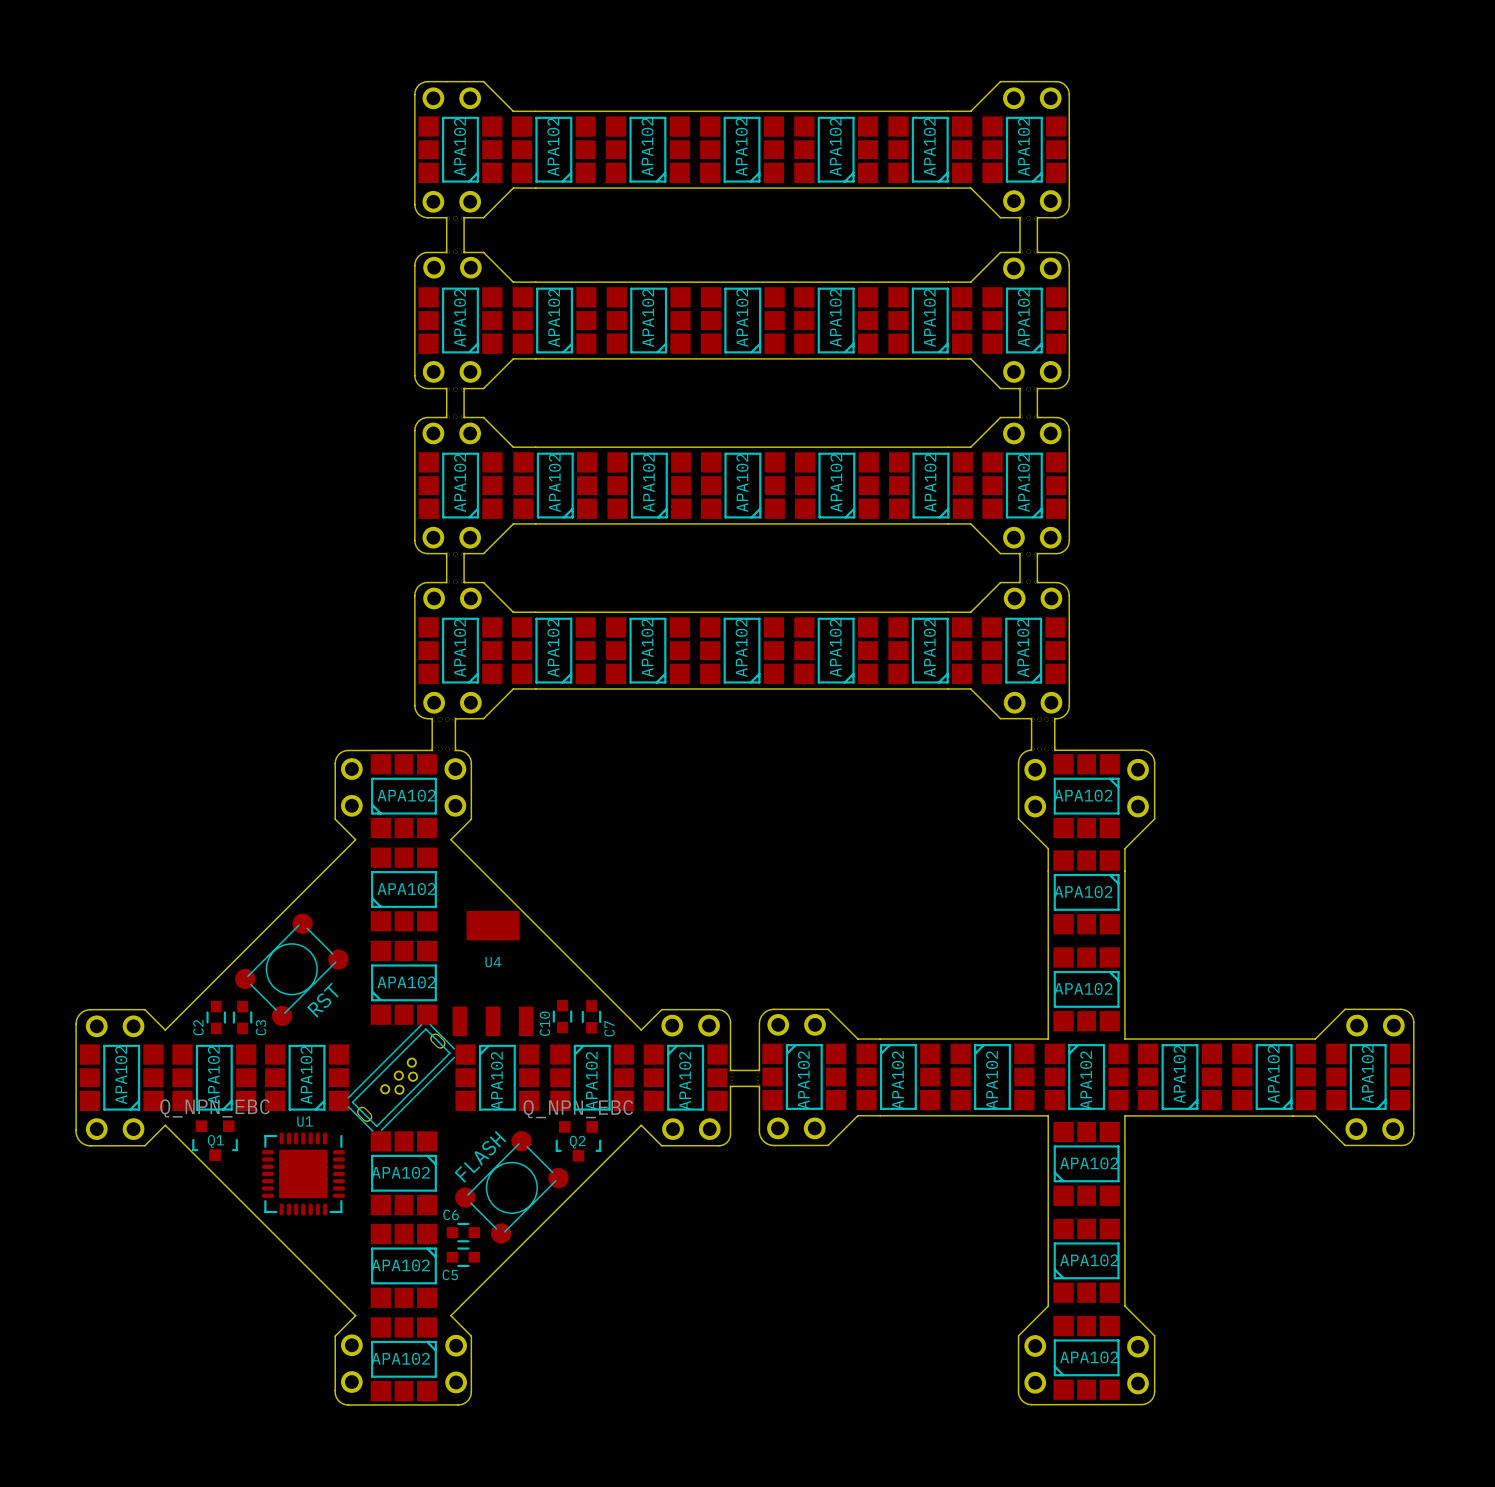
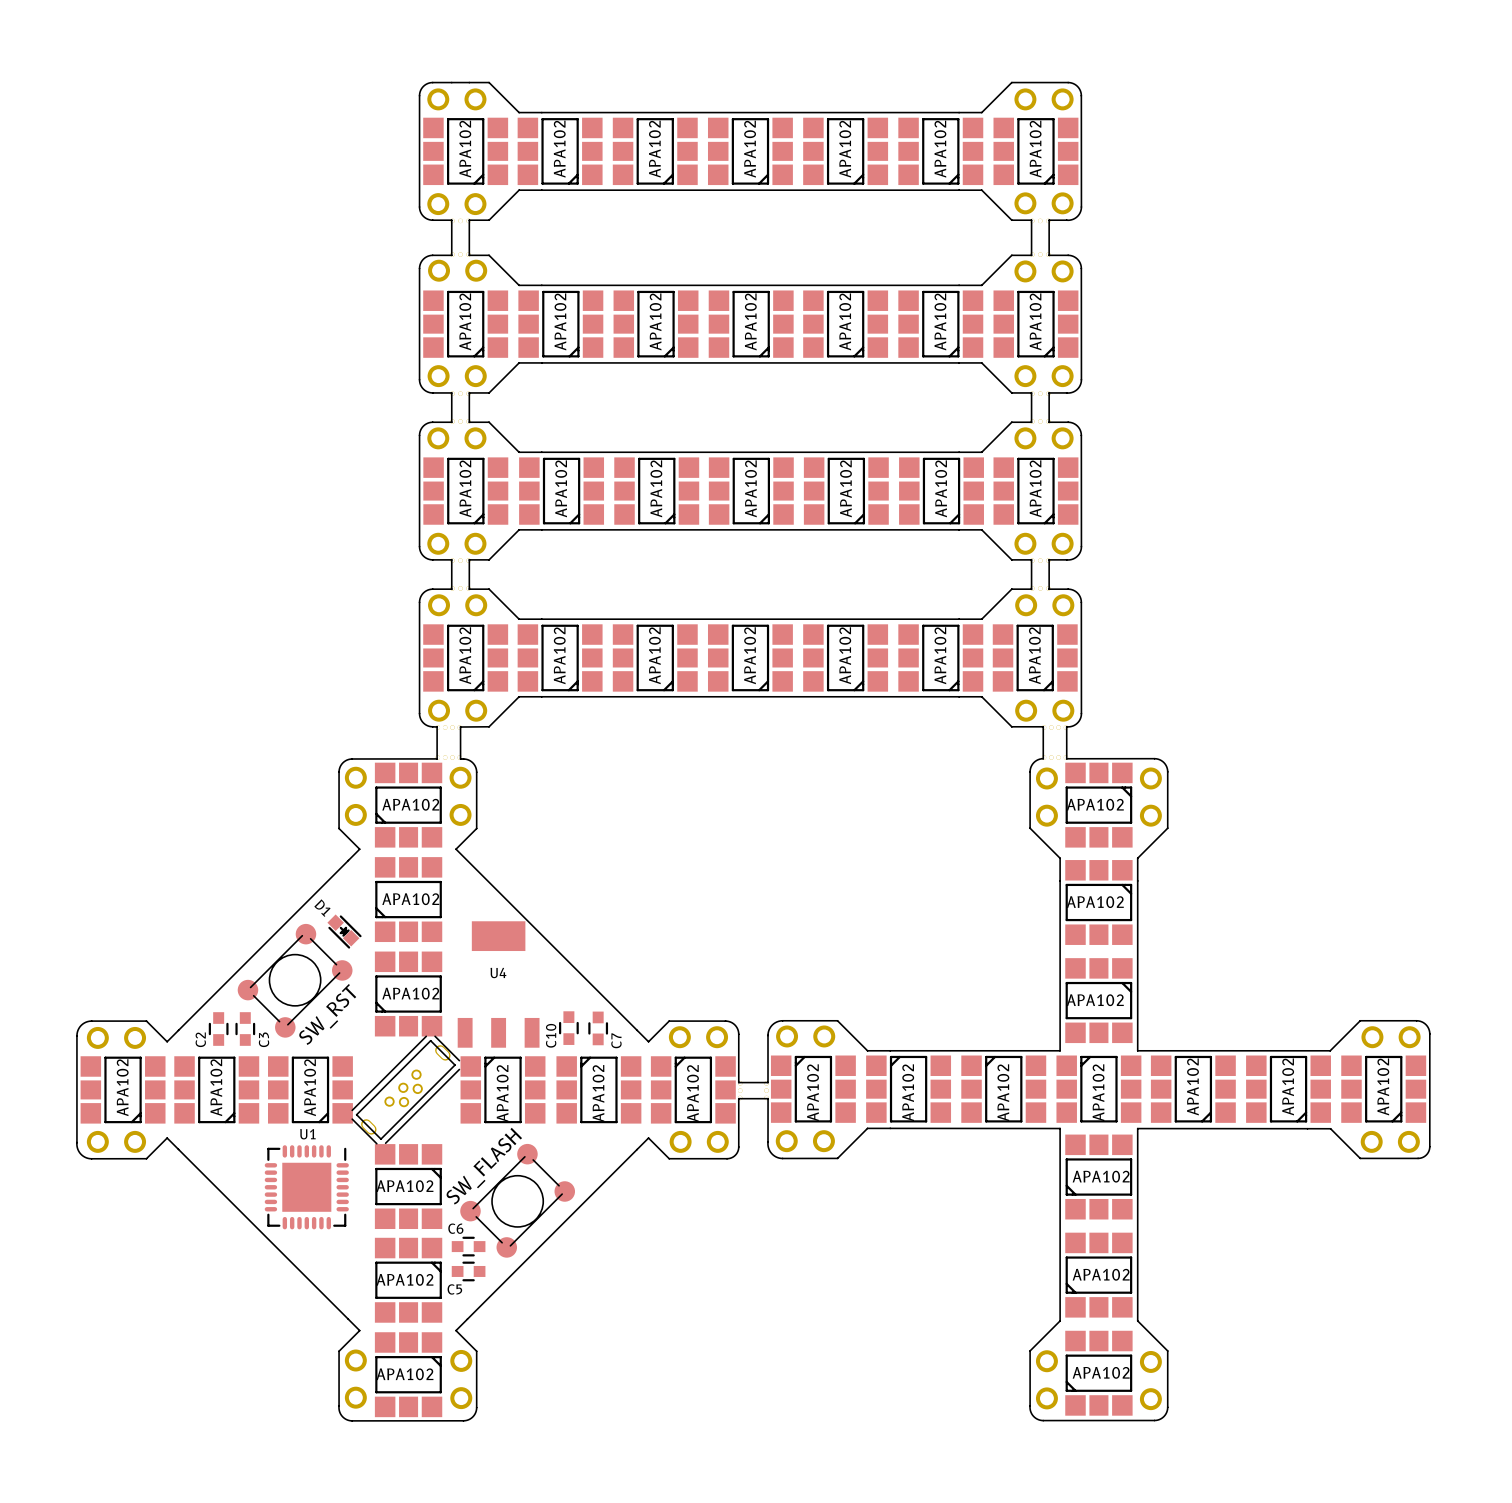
D1: none -> (344, 931)
part value: RST (322, 1000) -> SW_RST (327, 1014)
Q1: Q_NPN_EBC (215, 1140) -> none
Q2: Q_NPN_EBC (578, 1141) -> none
part value: FLASH (480, 1156) -> SW_FLASH (484, 1166)

